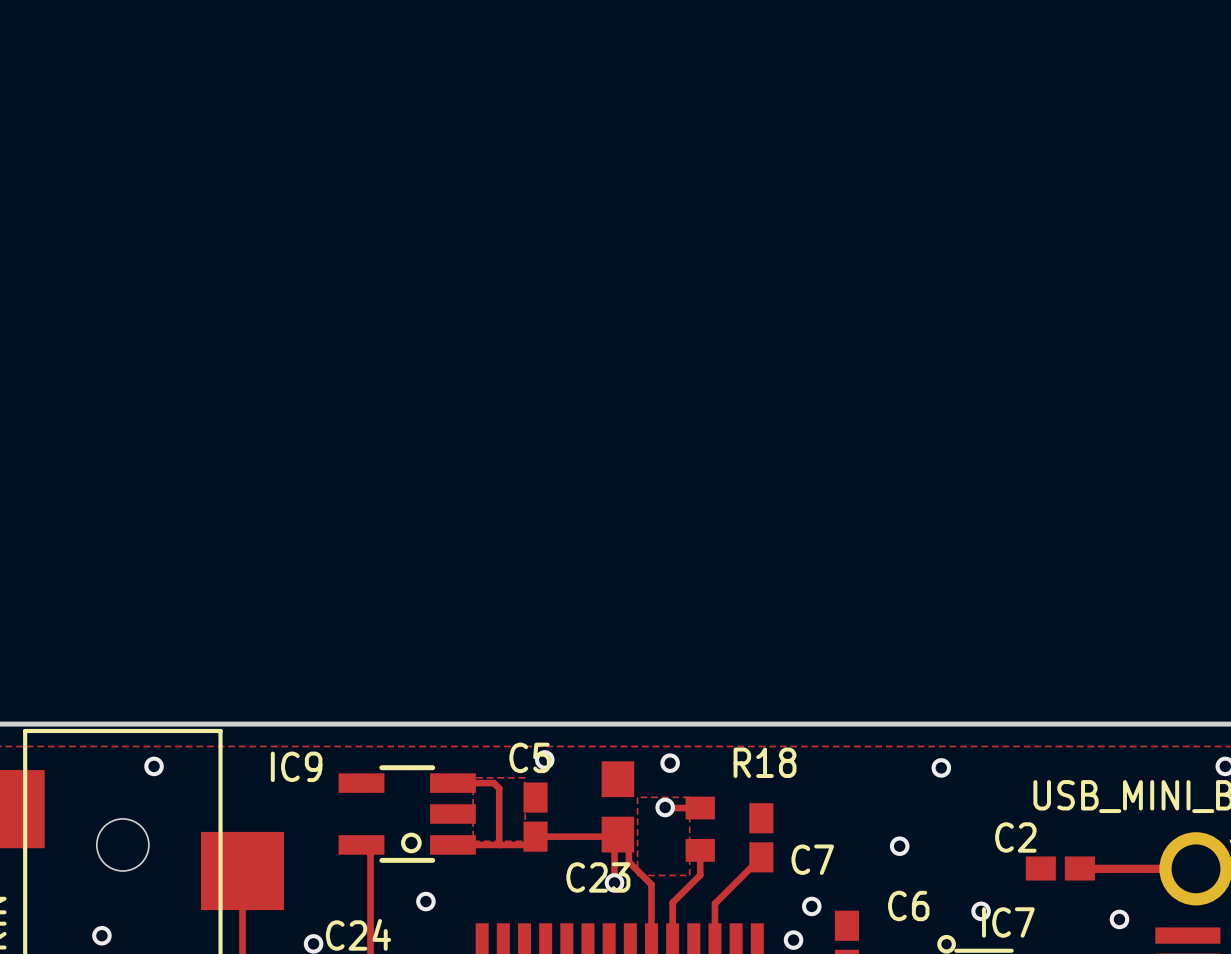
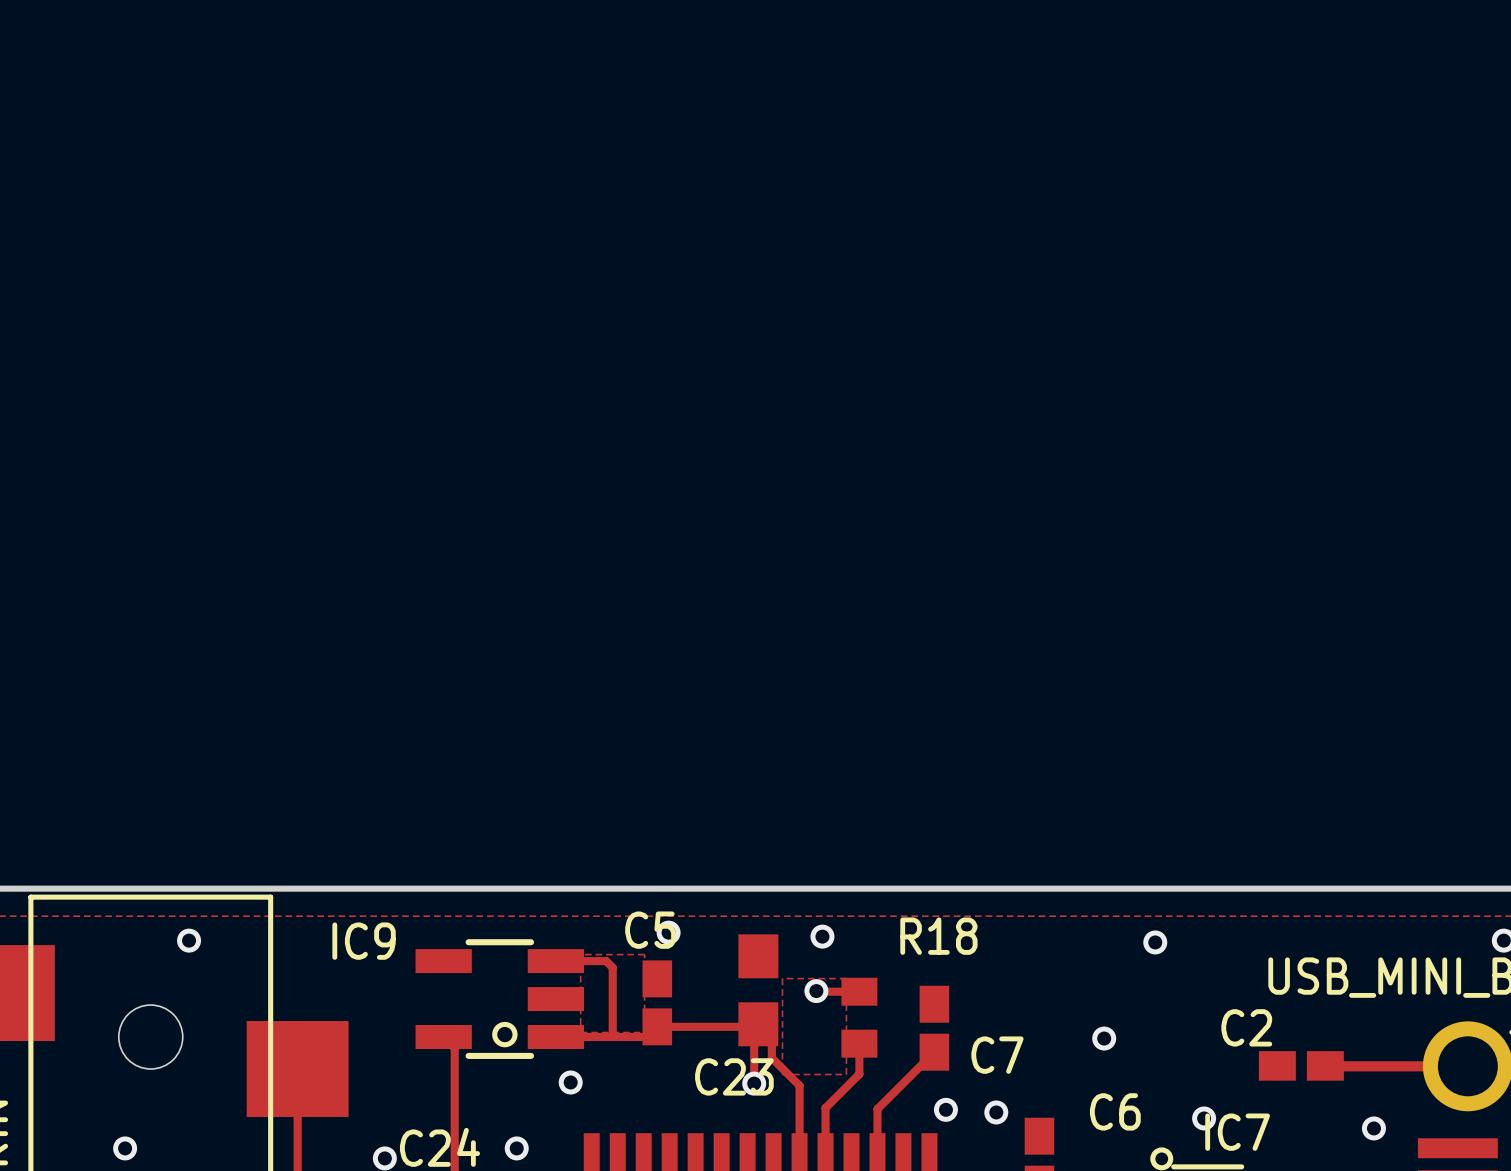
via: none -> (570, 1082)
via: (425, 901) -> none
via: none -> (516, 1148)
via position: (793, 940) -> (945, 1109)

